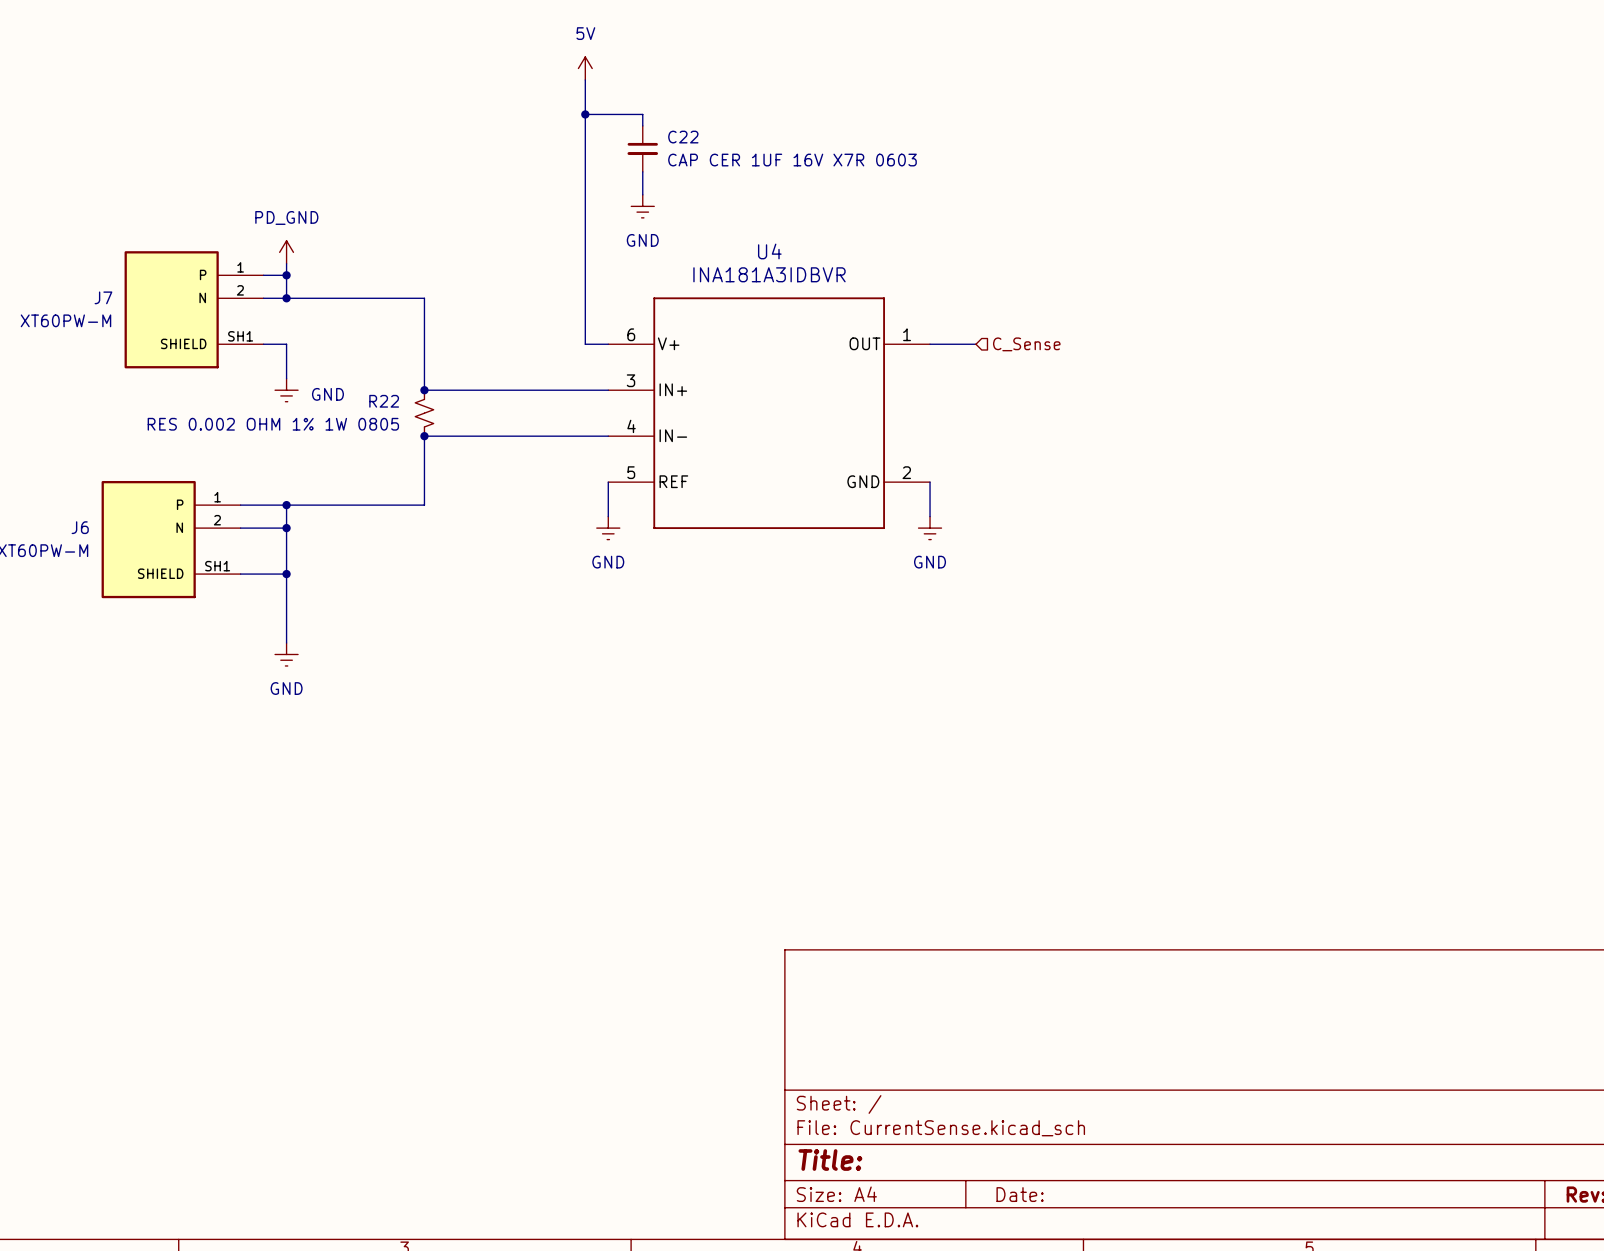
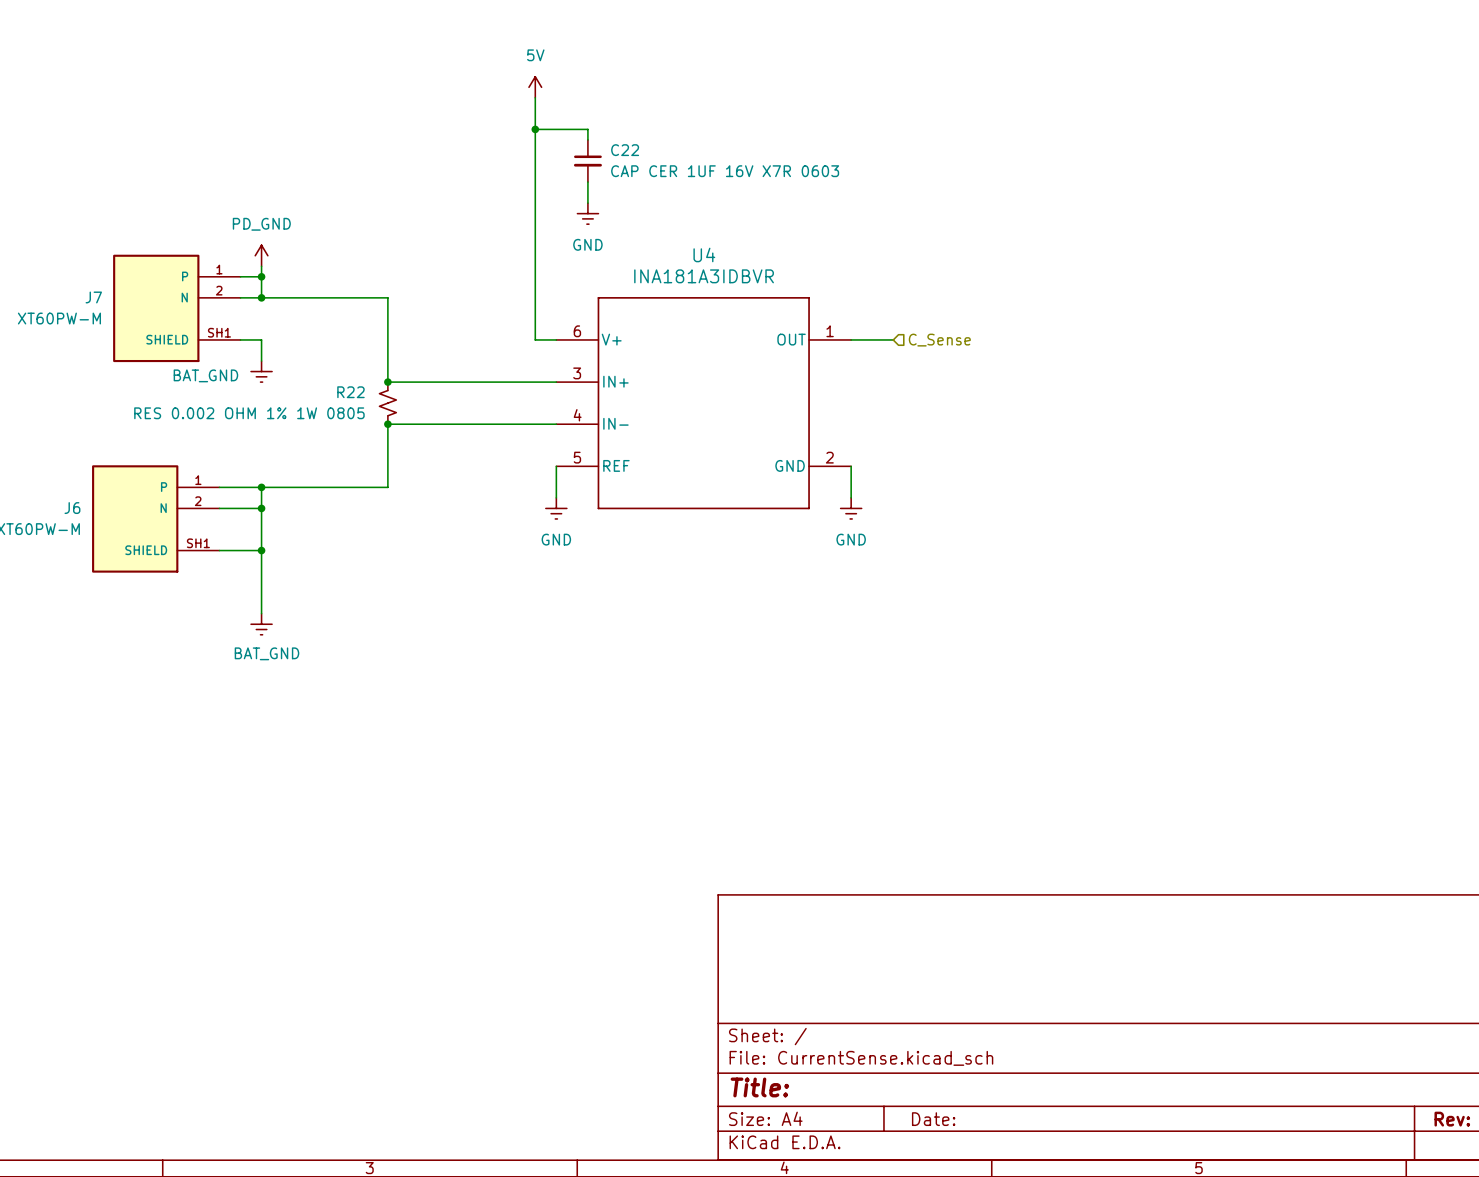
power symbol: none -> BAT_GND (261, 371)
power symbol: GND (286, 390) -> none
power symbol: GND (286, 654) -> BAT_GND (261, 624)

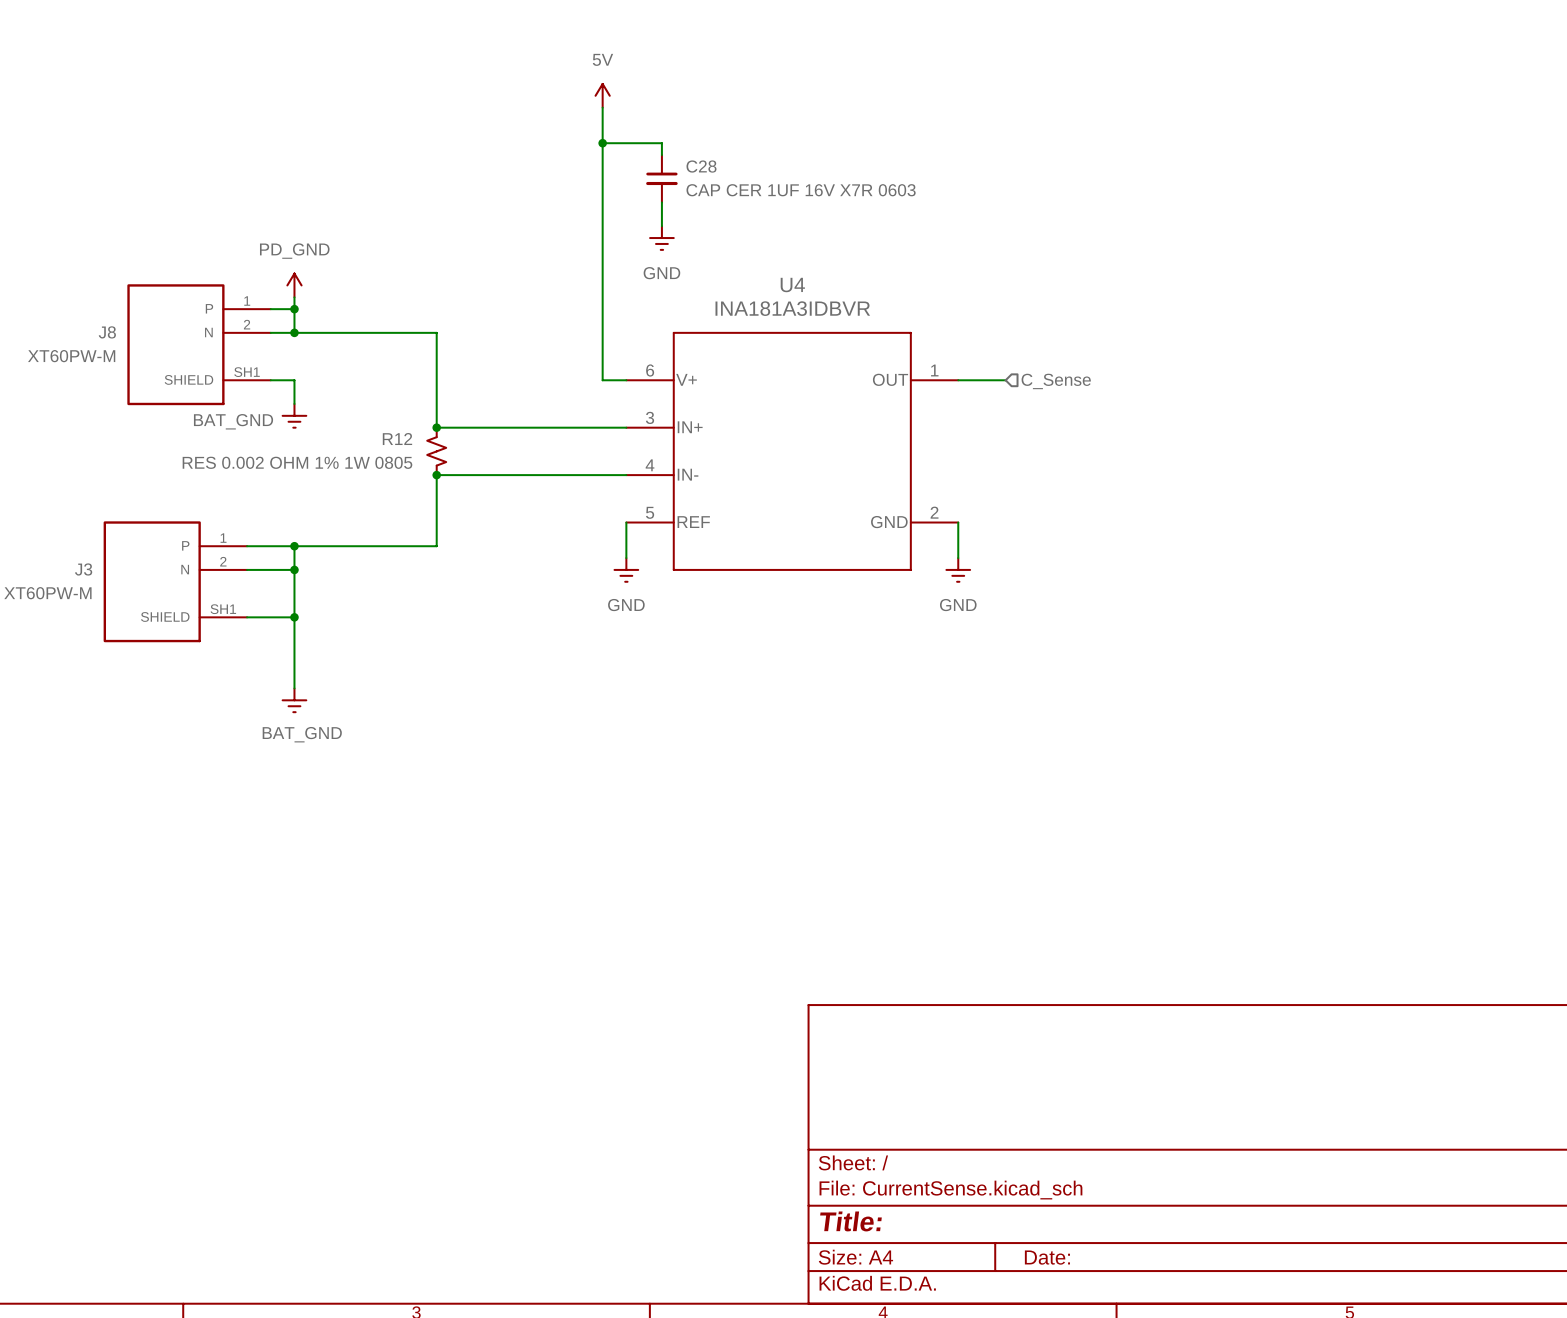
C22 name: C22 (625, 150) -> C28 (701, 166)
J7 name: J7 (93, 297) -> J8 (107, 332)
R22 name: R22 (350, 392) -> R12 (397, 439)
J6 name: J6 (72, 508) -> J3 (83, 569)

